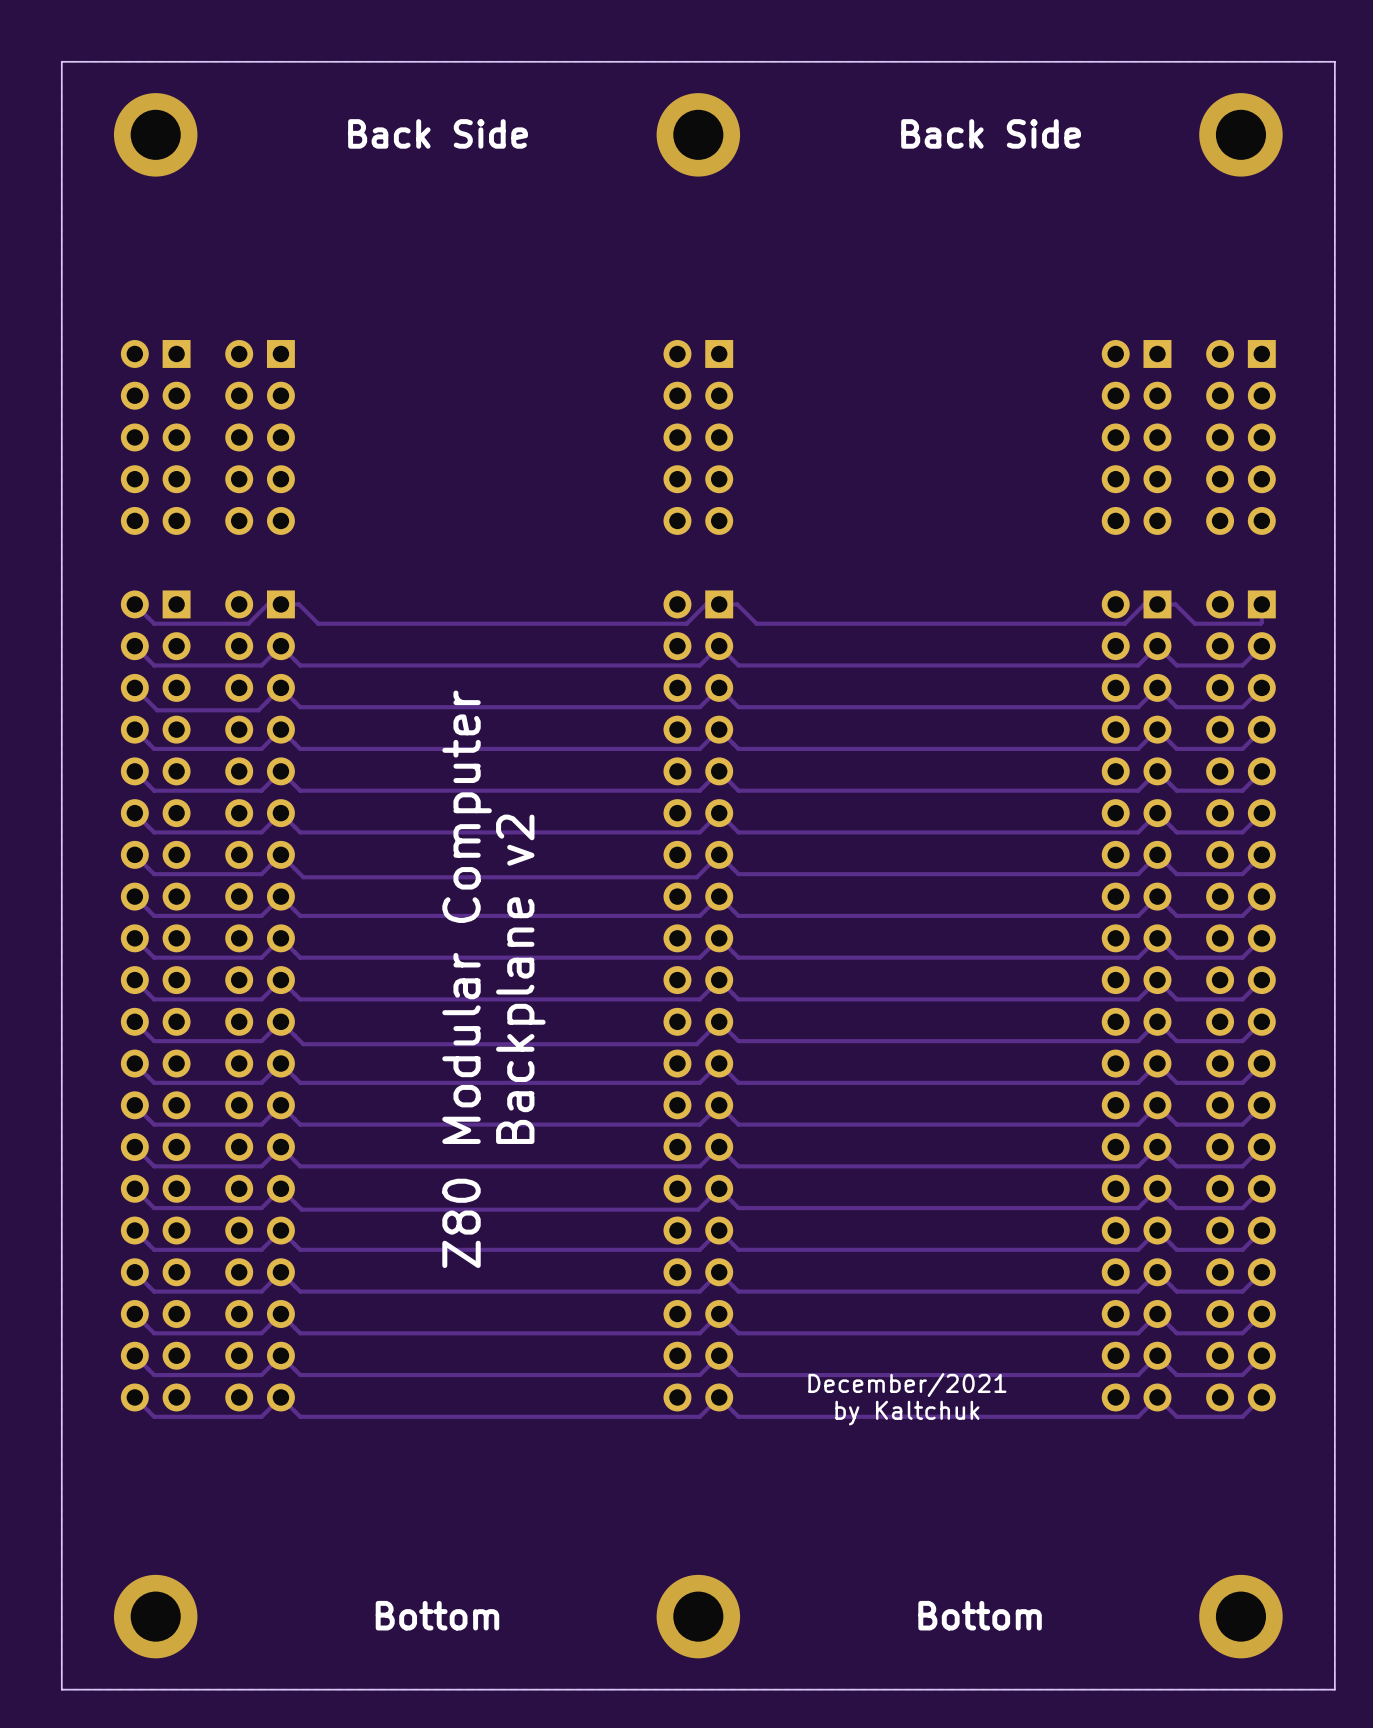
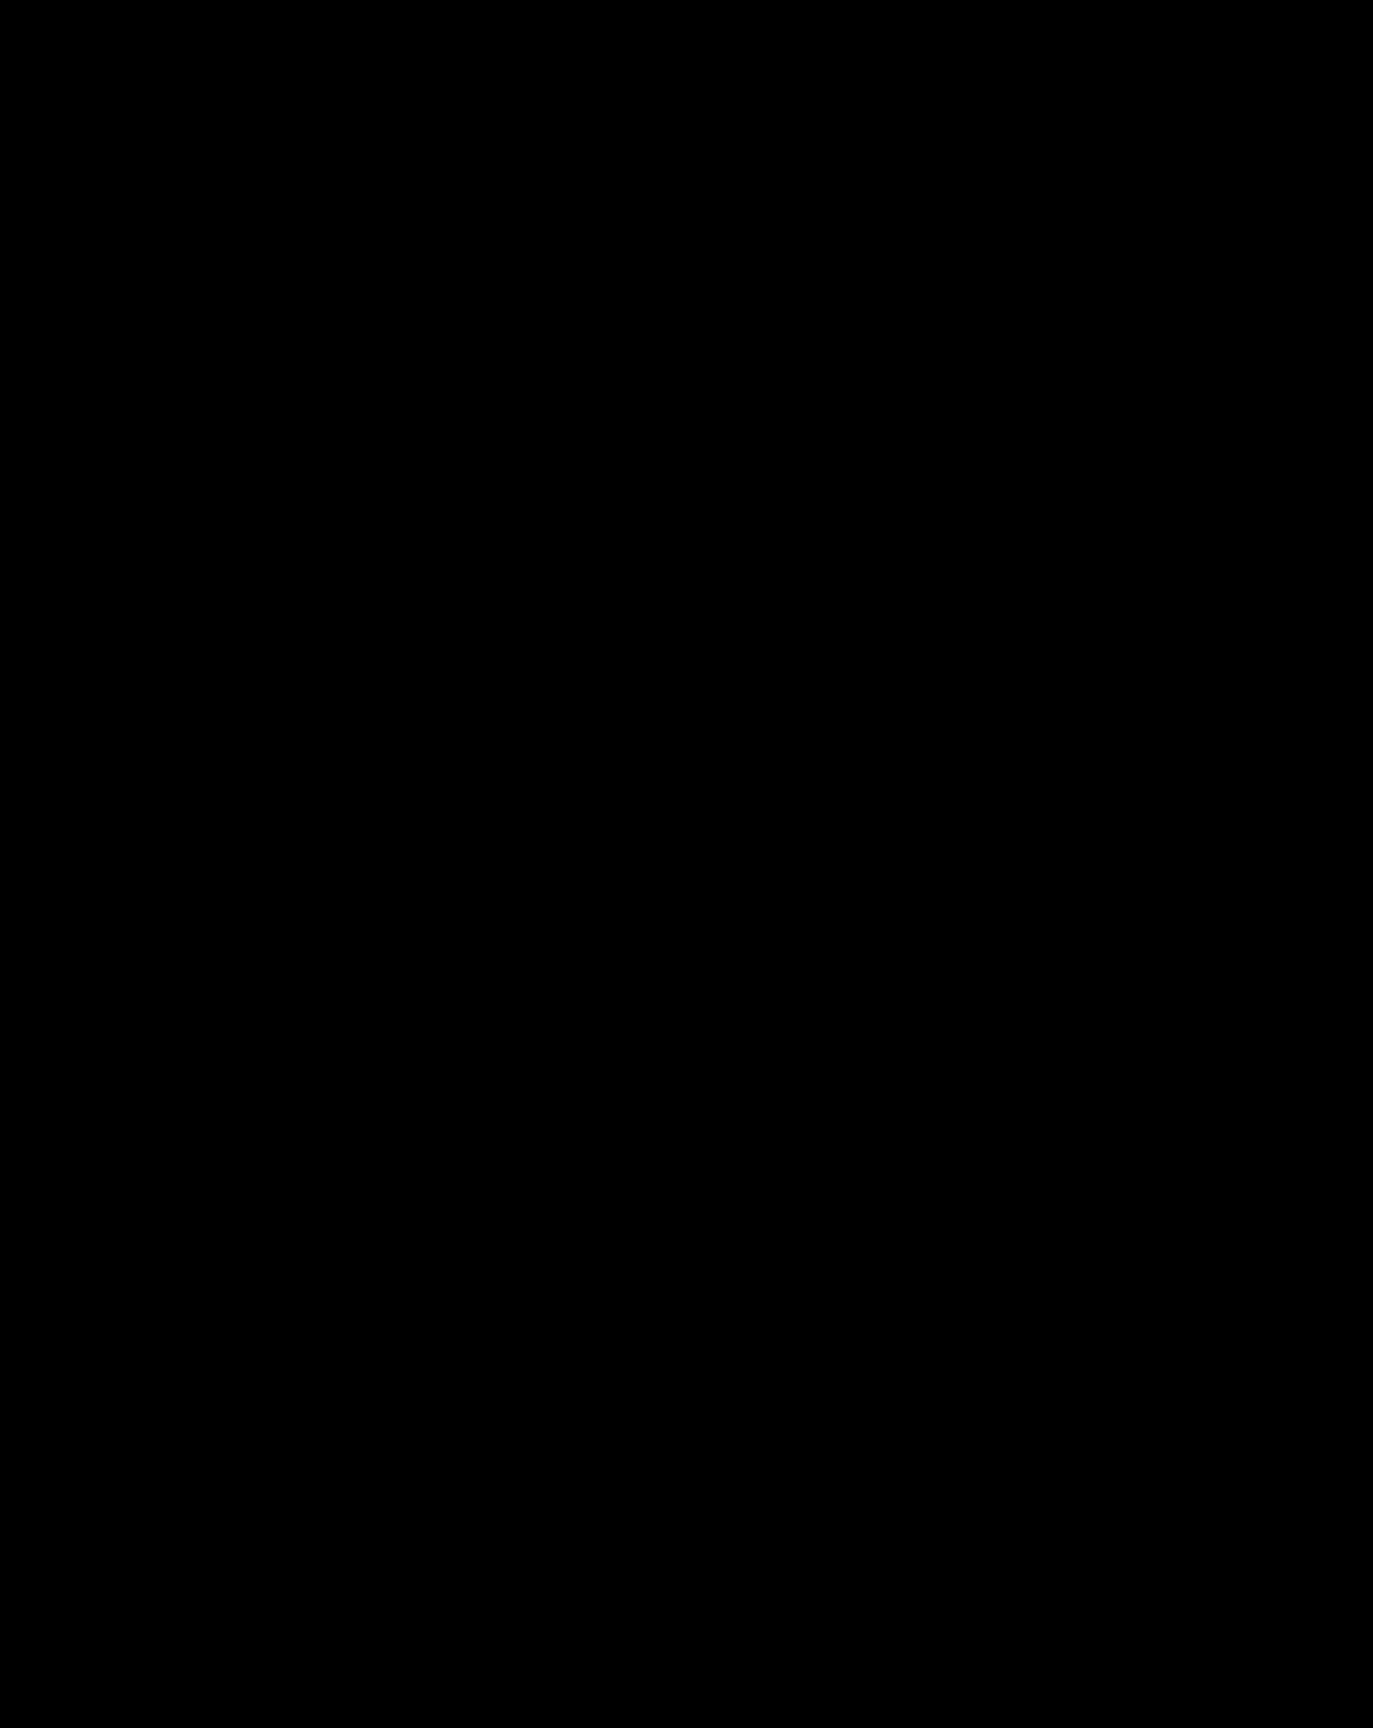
board edge: (1334, 61) (61, 61) (61, 1689) (1334, 1689) (1334, 61) -> none
text: Back Side (438, 133) -> none
text: Back Side (991, 133) -> none
via: (155, 134) -> none
via: (698, 134) -> none
via: (1240, 134) -> none
part: (155, 437) -> none
part: (260, 437) -> none
part: (698, 437) -> none
part: (1136, 437) -> none
part: (1240, 437) -> none
track: (1261, 604) (1260, 623) (1194, 623) (1175, 604) (1144, 604) (1125, 623) (756, 623) (737, 604) (706, 604) (686, 623) (318, 623) (299, 604) (267, 604) (248, 623) (154, 623) (134, 604) -> none
track: (1261, 646) (1242, 665) (1176, 665) (1157, 646) (1138, 665) (738, 665) (719, 646) (699, 665) (300, 665) (280, 646) (261, 665) (154, 665) (134, 646) -> none
track: (1261, 687) (1242, 707) (1176, 707) (1157, 687) (1138, 707) (738, 707) (719, 687) (699, 707) (300, 707) (280, 687) (258, 710) (157, 710) (134, 687) -> none
track: (1261, 729) (1242, 748) (1176, 748) (1157, 729) (1138, 748) (738, 748) (719, 729) (699, 748) (300, 748) (280, 729) (261, 748) (154, 748) (134, 729) -> none
track: (1261, 771) (1242, 790) (1176, 790) (1157, 771) (1138, 790) (738, 790) (719, 771) (699, 790) (300, 790) (280, 771) (261, 790) (154, 790) (134, 771) -> none
track: (1261, 813) (1242, 832) (1176, 832) (1157, 813) (1138, 832) (738, 832) (719, 813) (699, 832) (300, 832) (280, 813) (261, 832) (154, 832) (134, 813) -> none
track: (1261, 854) (1242, 874) (1176, 874) (1157, 854) (1138, 874) (738, 874) (719, 854) (696, 877) (303, 877) (280, 854) (261, 874) (154, 874) (134, 854) -> none
track: (1261, 896) (1242, 915) (1176, 915) (1157, 896) (1138, 915) (738, 915) (719, 896) (699, 915) (300, 915) (280, 896) (261, 915) (154, 915) (134, 896) -> none
track: (1261, 938) (1242, 957) (1176, 957) (1157, 938) (1138, 957) (738, 957) (719, 938) (699, 957) (300, 957) (280, 938) (261, 957) (154, 957) (134, 938) -> none
text: Z80 Modular Computer (467, 979) -> none
text: Backplane v2 (520, 979) -> none
track: (1261, 980) (1242, 999) (1176, 999) (1157, 980) (1138, 999) (738, 999) (719, 980) (699, 999) (300, 999) (280, 980) (261, 999) (154, 999) (134, 980) -> none
part: (155, 1000) -> none
part: (260, 1000) -> none
part: (698, 1000) -> none
part: (1136, 1000) -> none
part: (1240, 1000) -> none
track: (1261, 1021) (1242, 1041) (1176, 1041) (1157, 1021) (1138, 1041) (738, 1041) (719, 1021) (696, 1044) (303, 1044) (280, 1021) (261, 1041) (154, 1041) (134, 1021) -> none
track: (1261, 1063) (1242, 1082) (1176, 1082) (1157, 1063) (1138, 1082) (738, 1082) (719, 1063) (699, 1082) (300, 1082) (280, 1063) (261, 1082) (154, 1082) (134, 1063) -> none
track: (1261, 1105) (1242, 1124) (1176, 1124) (1157, 1105) (1138, 1124) (738, 1124) (719, 1105) (699, 1124) (300, 1124) (280, 1105) (261, 1124) (154, 1124) (134, 1105) -> none
track: (1261, 1147) (1242, 1166) (1176, 1166) (1157, 1147) (1138, 1166) (738, 1166) (719, 1147) (699, 1166) (300, 1166) (280, 1147) (261, 1166) (154, 1166) (134, 1147) -> none
track: (1261, 1188) (1242, 1208) (1176, 1208) (1157, 1188) (1138, 1208) (738, 1208) (719, 1188) (698, 1209) (301, 1209) (280, 1188) (261, 1208) (154, 1208) (134, 1188) -> none
track: (1261, 1230) (1242, 1249) (1176, 1249) (1157, 1230) (1138, 1249) (738, 1249) (719, 1230) (699, 1249) (300, 1249) (280, 1230) (261, 1249) (154, 1249) (134, 1230) -> none
track: (1261, 1272) (1242, 1291) (1176, 1291) (1157, 1272) (1138, 1291) (738, 1291) (719, 1272) (699, 1291) (300, 1291) (280, 1272) (261, 1291) (154, 1291) (134, 1272) -> none
track: (1261, 1314) (1242, 1333) (1176, 1333) (1157, 1314) (1138, 1333) (738, 1333) (719, 1314) (699, 1333) (300, 1333) (280, 1314) (261, 1333) (154, 1333) (134, 1314) -> none
track: (1261, 1355) (1242, 1375) (1176, 1375) (1157, 1355) (1138, 1375) (738, 1375) (719, 1355) (699, 1375) (300, 1375) (280, 1355) (261, 1375) (154, 1375) (134, 1355) -> none
text: December/2021 (907, 1385) -> none
track: (1261, 1397) (1242, 1416) (1176, 1416) (1157, 1397) (1138, 1416) (738, 1416) (719, 1397) (699, 1416) (300, 1416) (280, 1397) (261, 1416) (154, 1416) (134, 1397) -> none
text: by Kaltchuk (907, 1413) -> none
text: Bottom (437, 1615) -> none
text: Bottom (980, 1615) -> none
via: (155, 1616) -> none
via: (698, 1616) -> none
via: (1240, 1616) -> none

